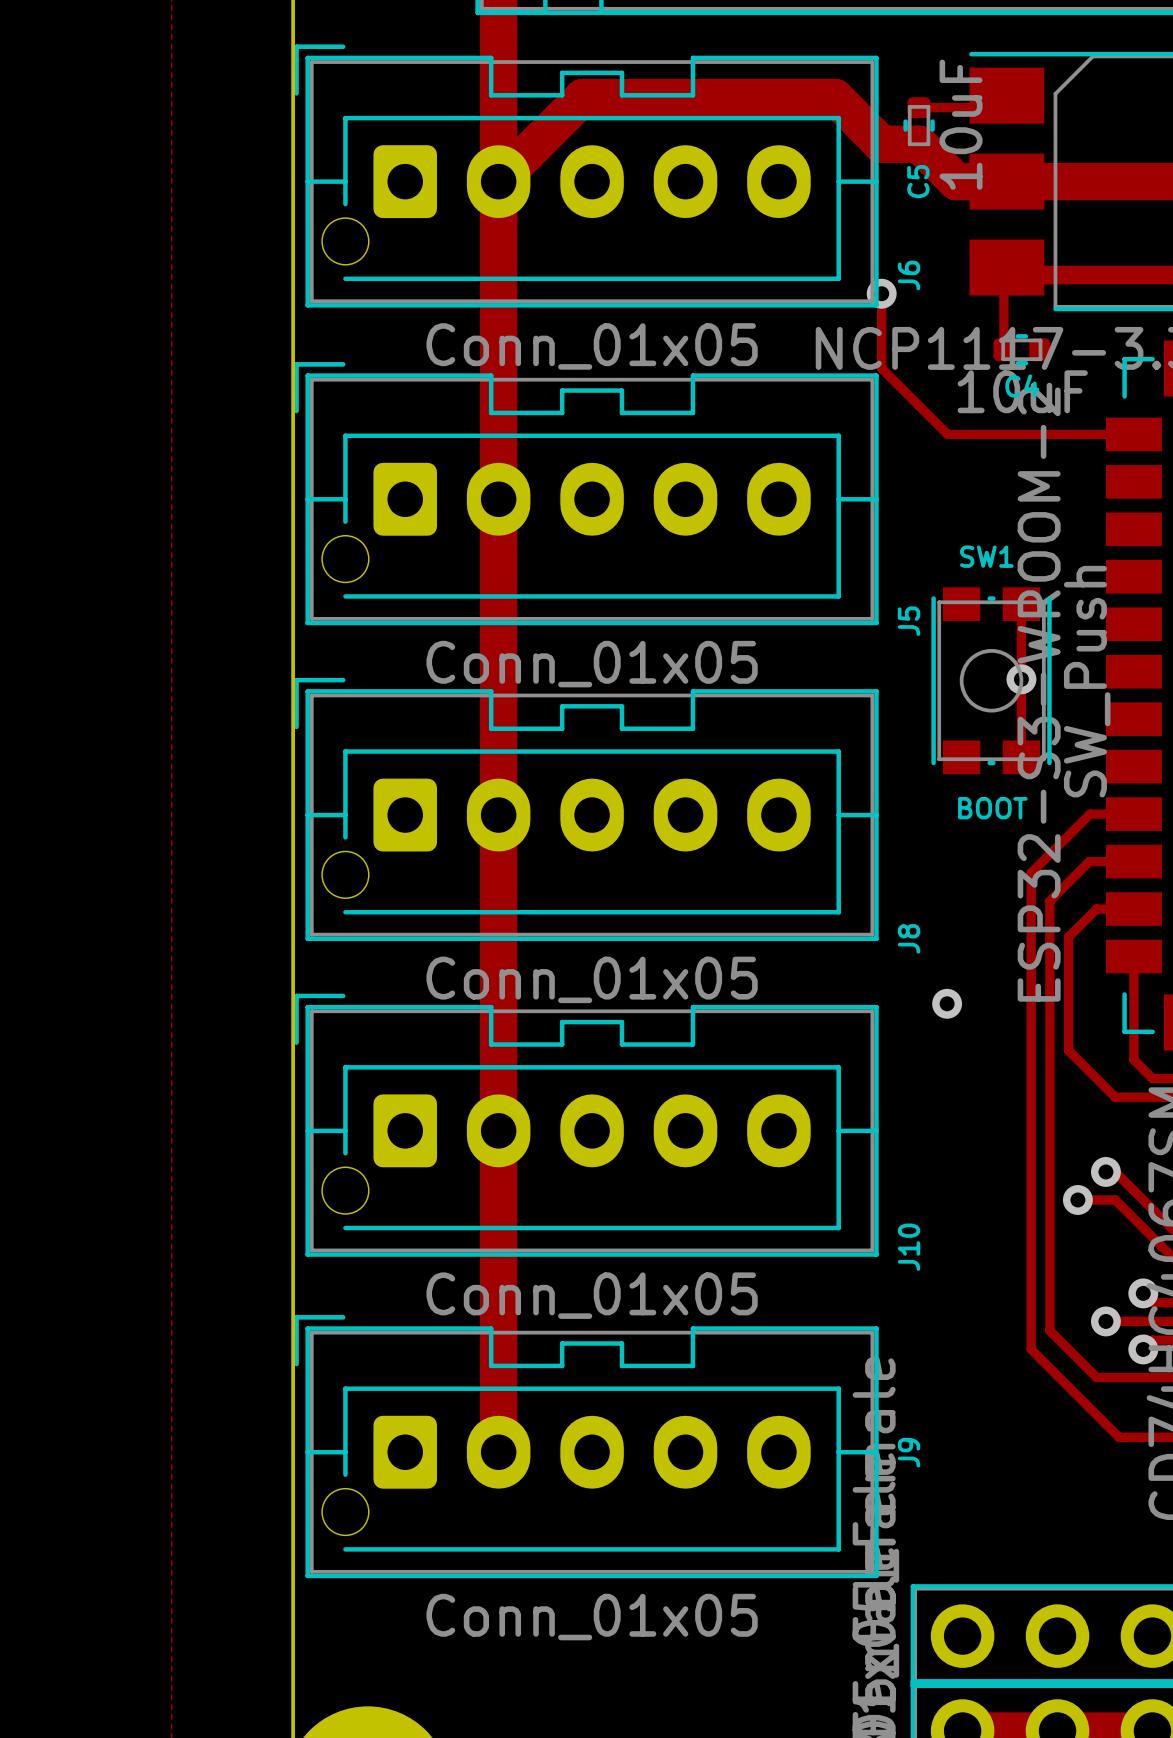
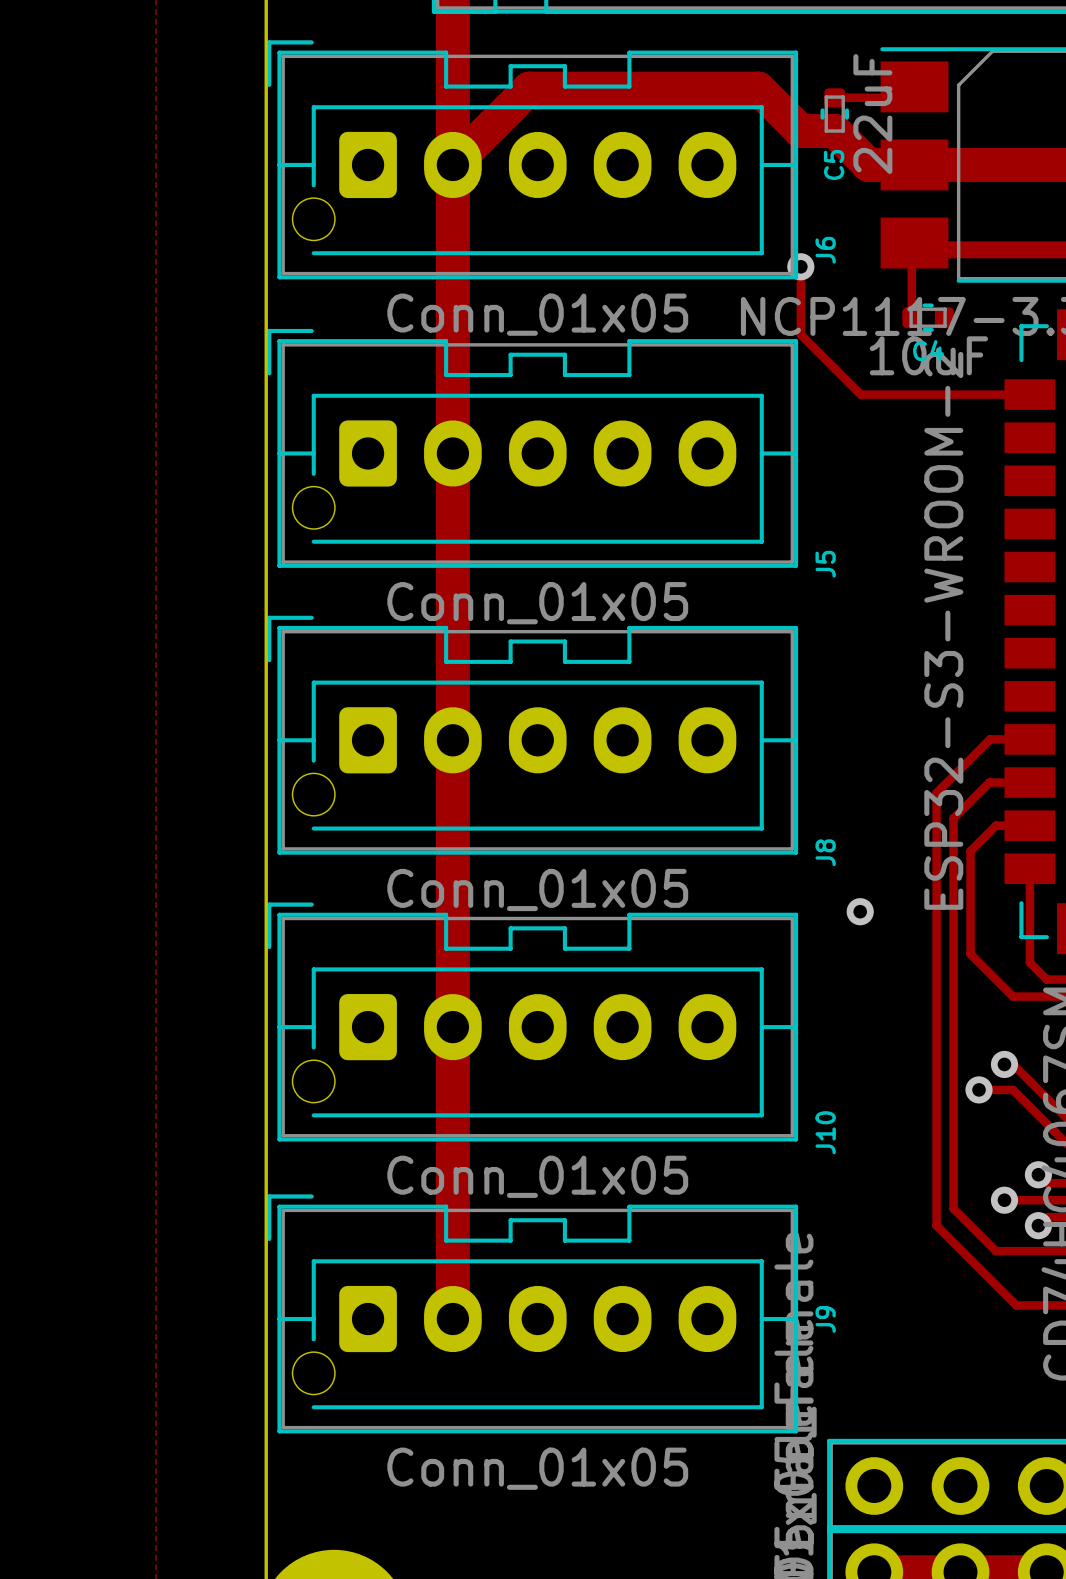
C5 value: 10uF (961, 124) -> 22uF (872, 114)
track: (1021, 604) (1021, 757) -> none
via: (1021, 679) -> none
SW1: SW_Push (991, 680) -> none
text: BOOT (992, 808) -> none

